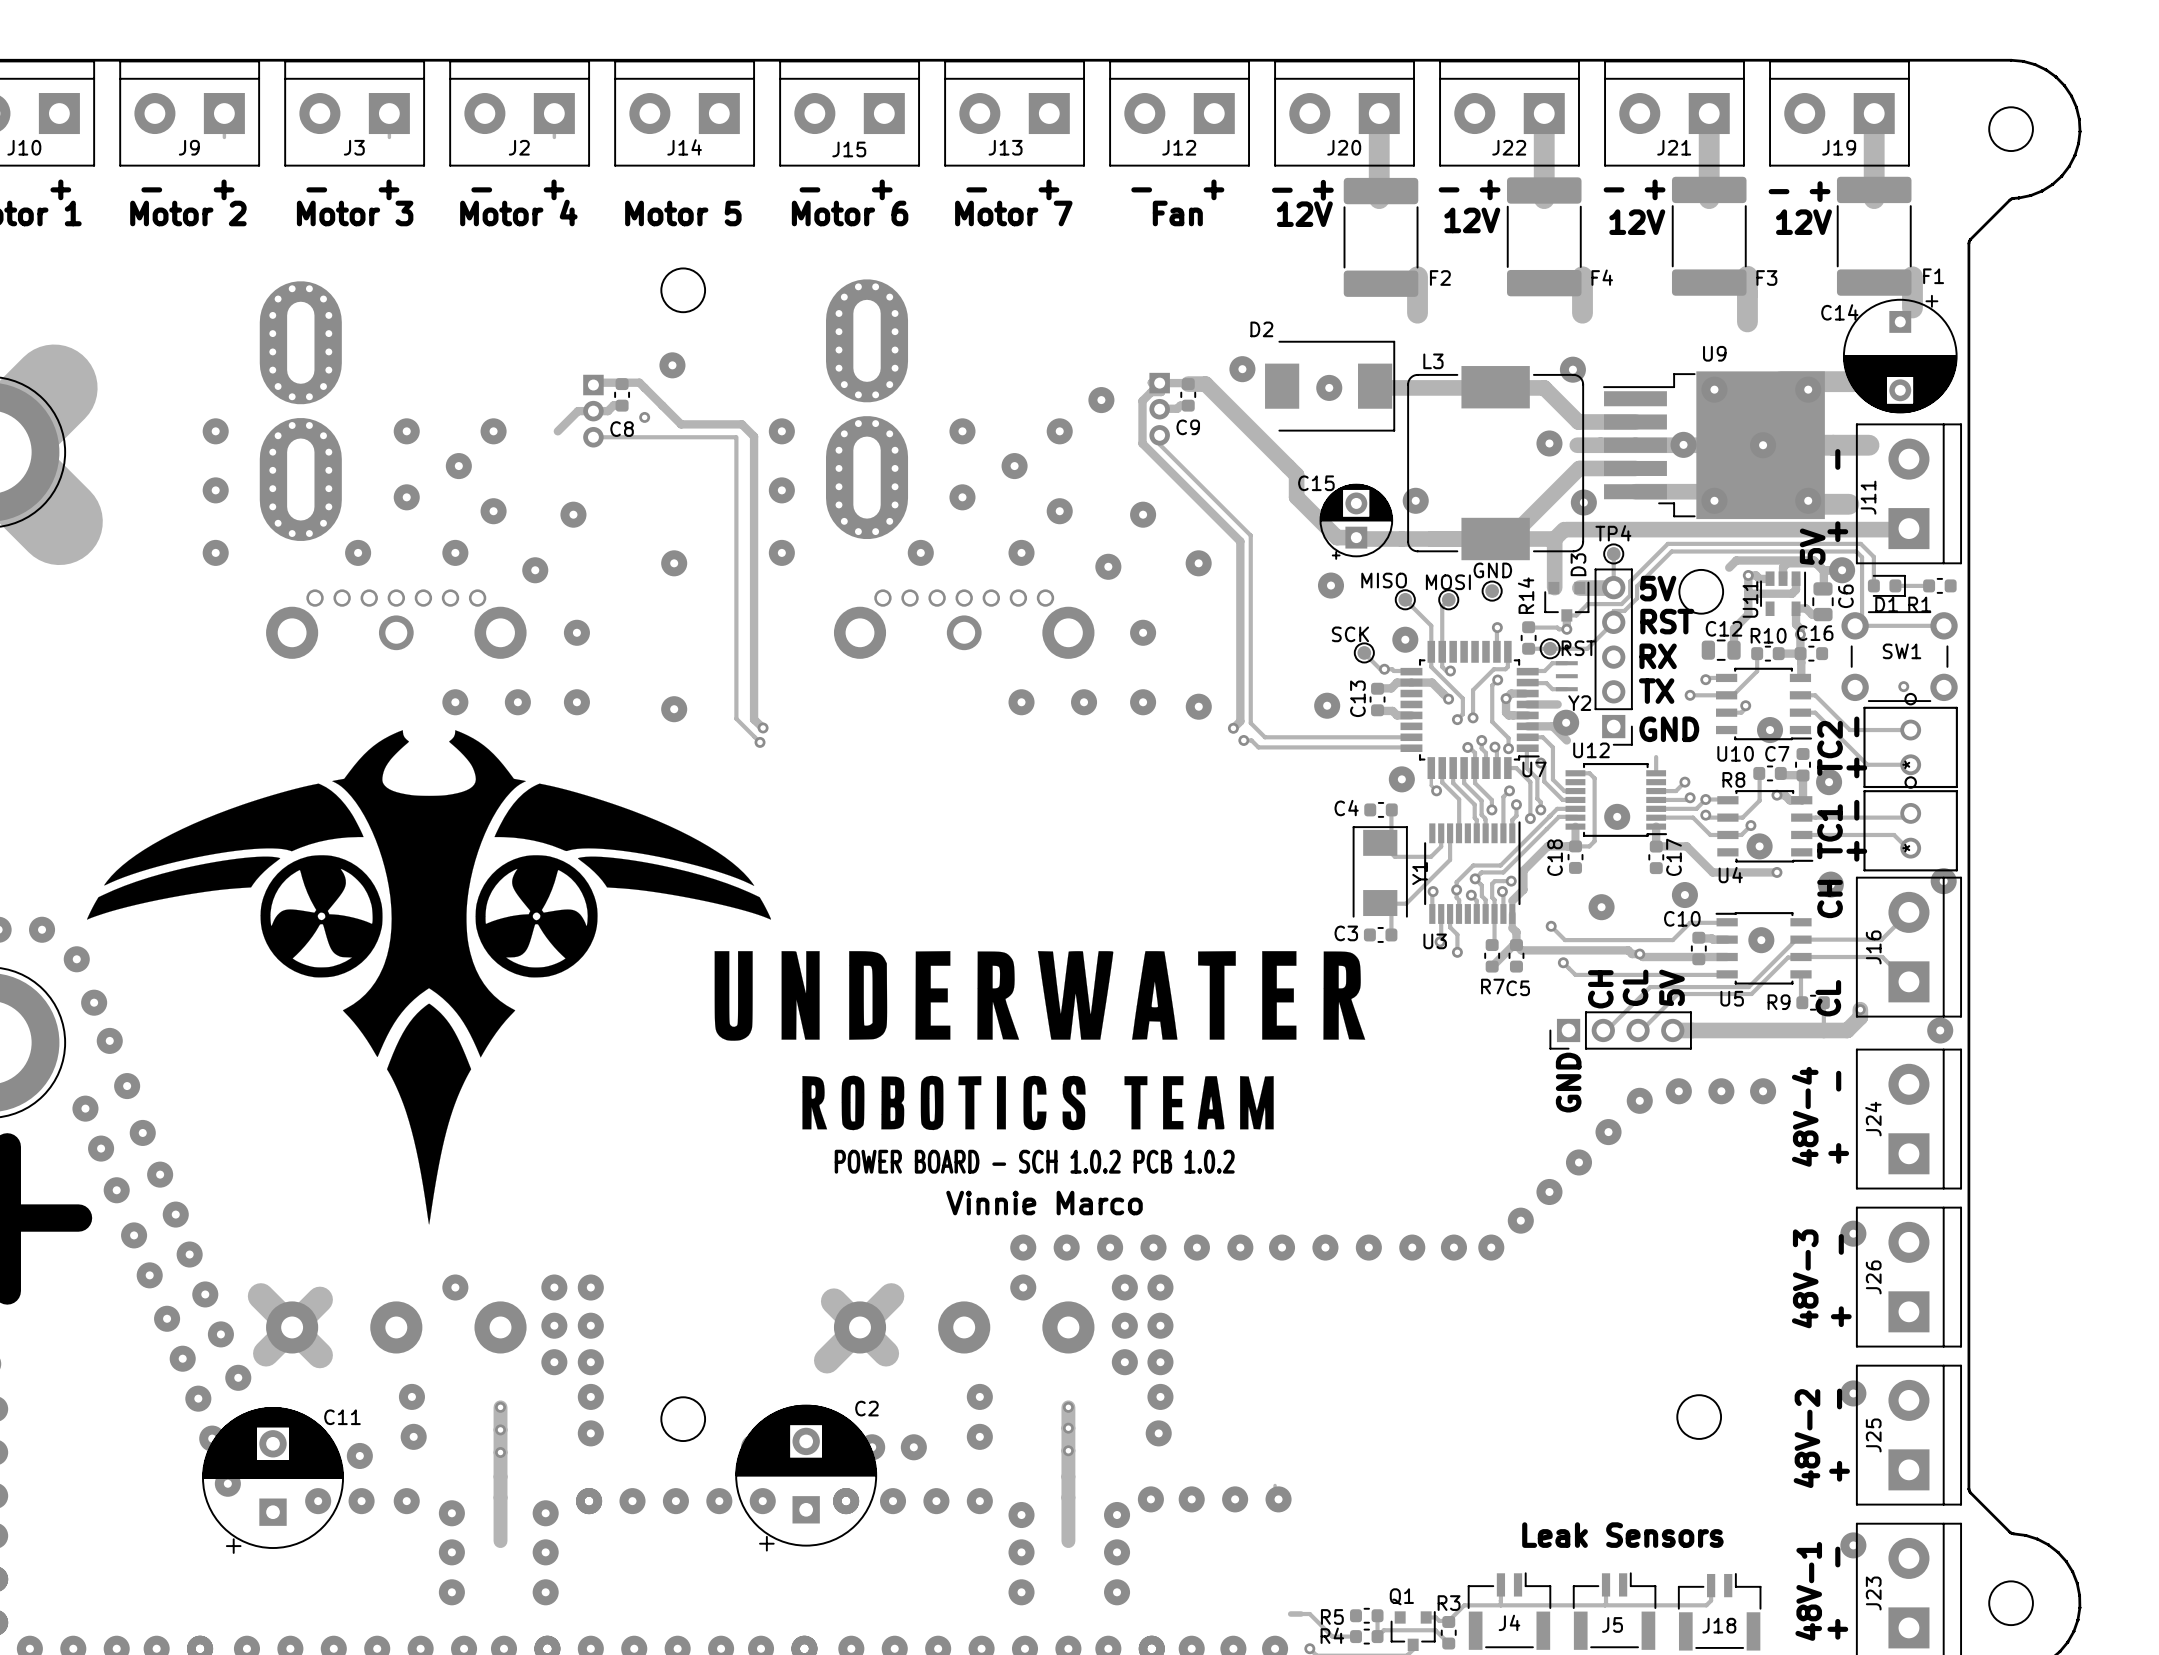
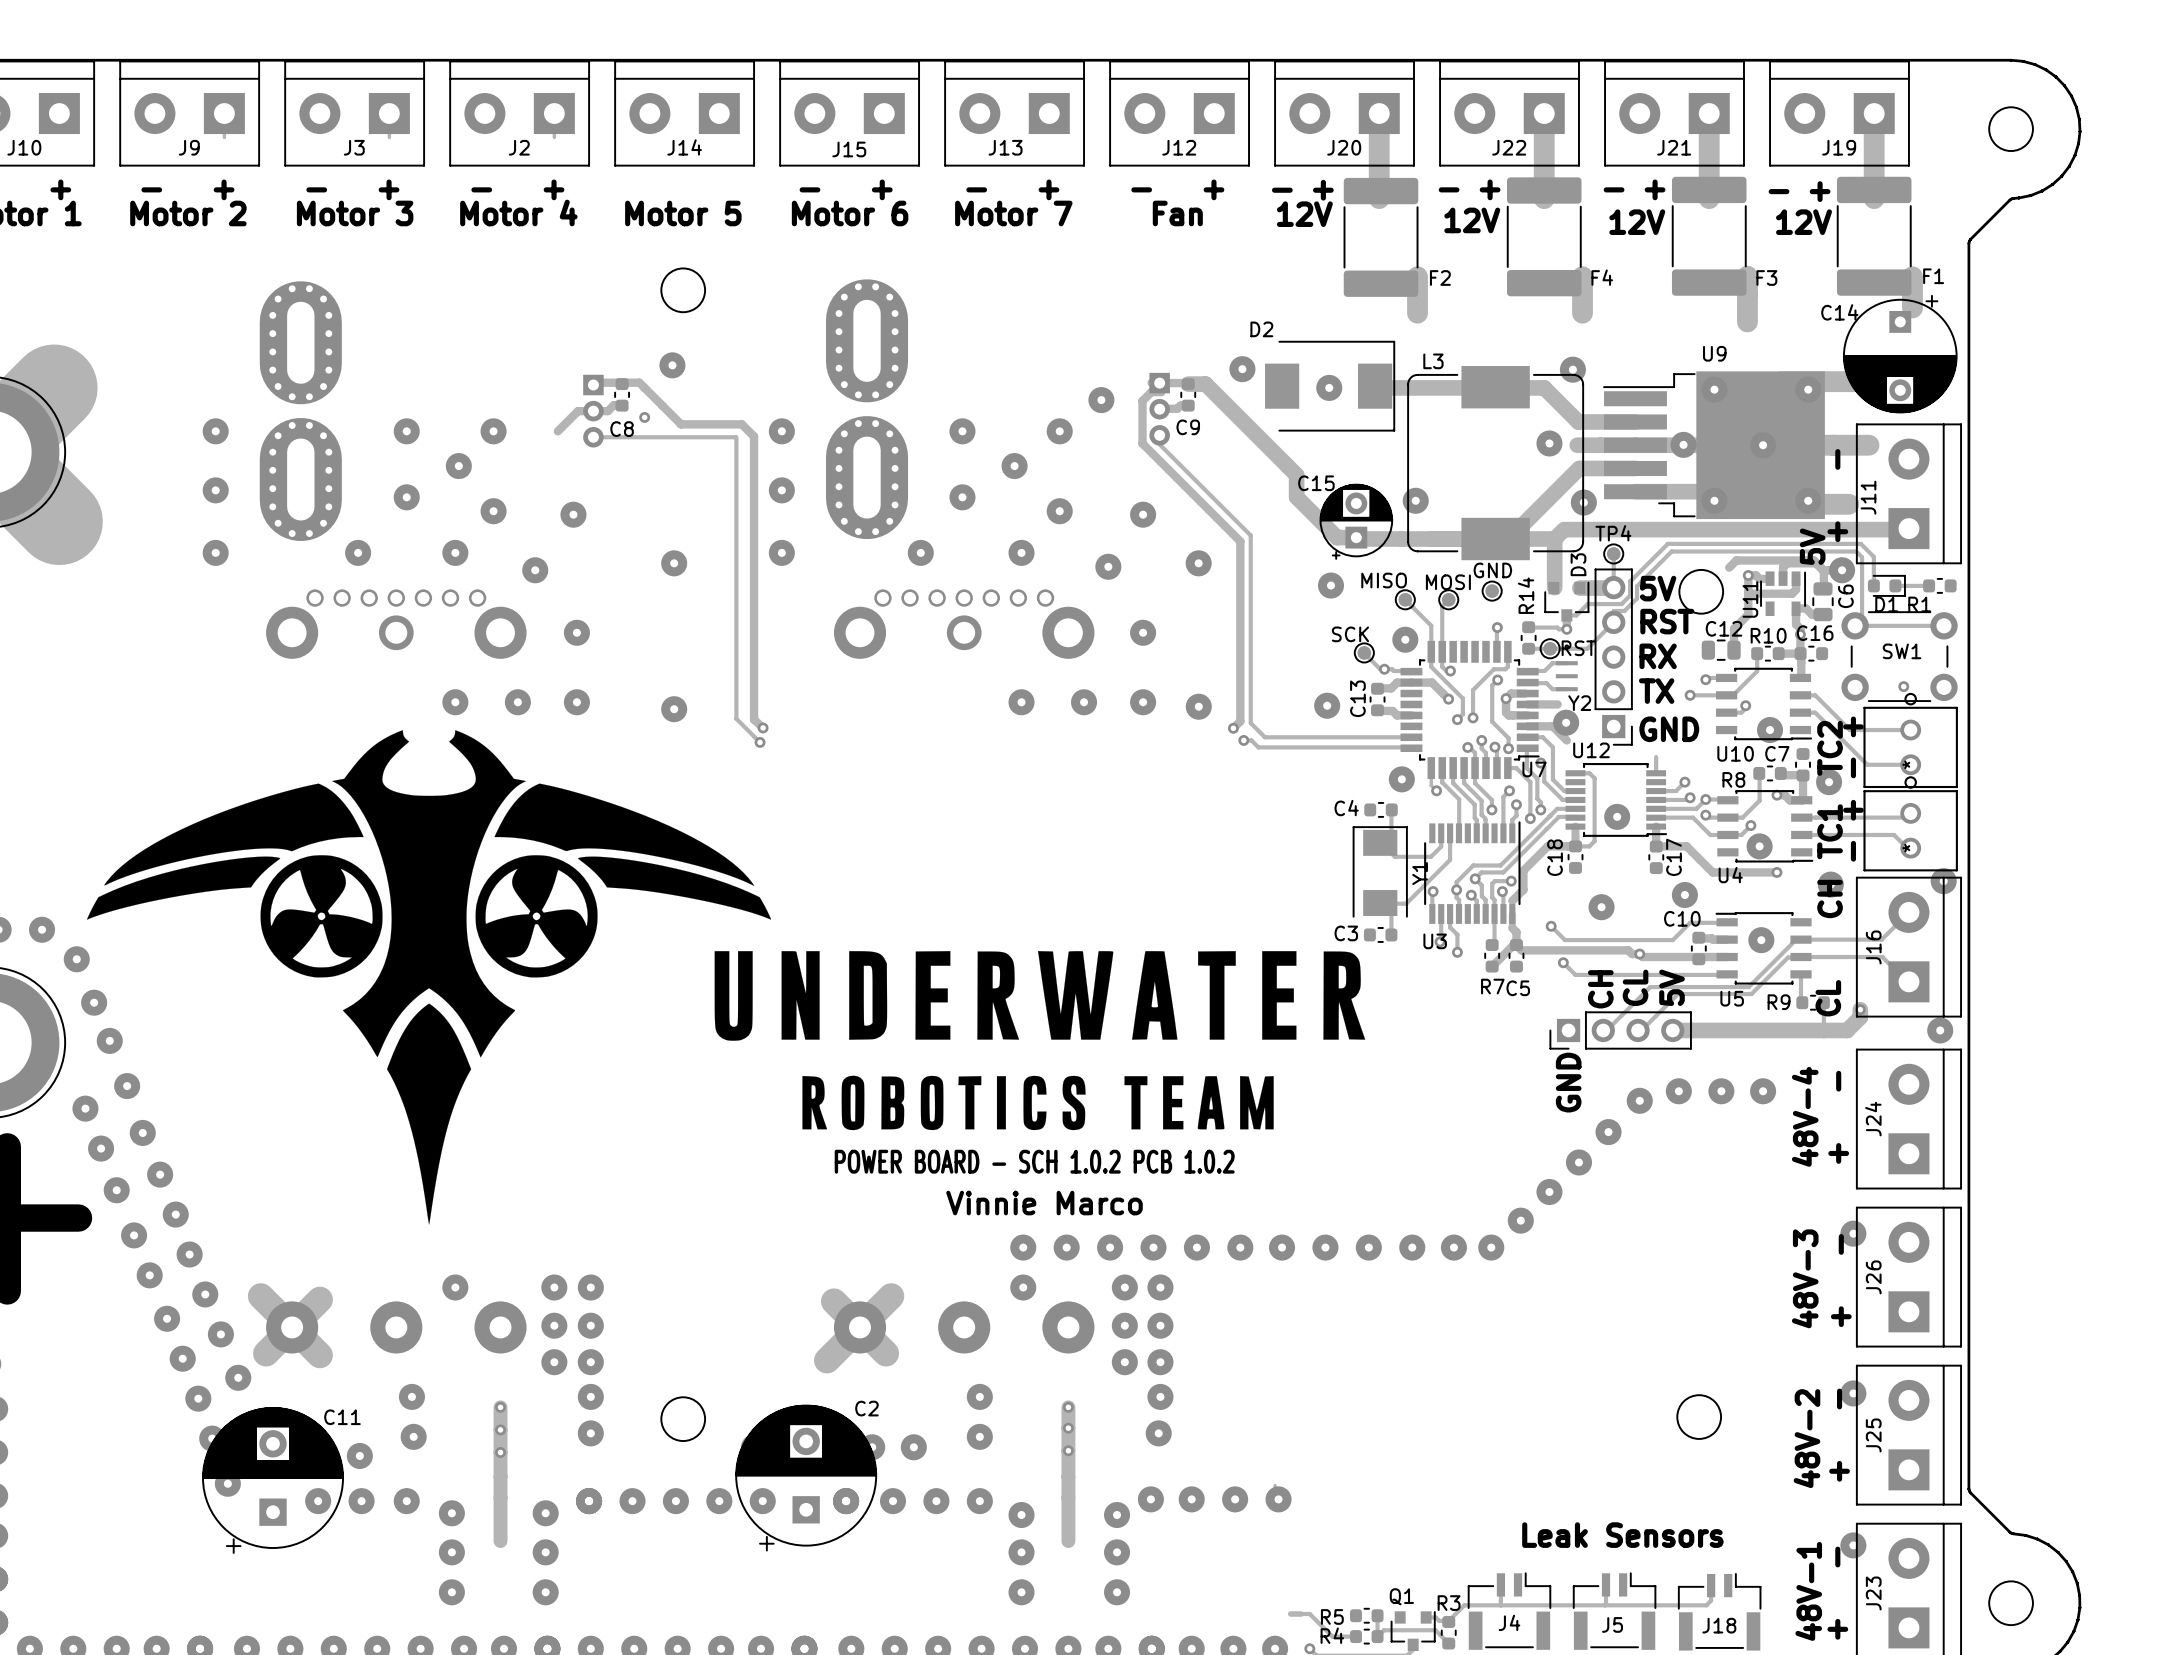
text rotation: 0° (1856, 747) -> 180° (1853, 747)
text rotation: 0° (1856, 830) -> 180° (1853, 830)

